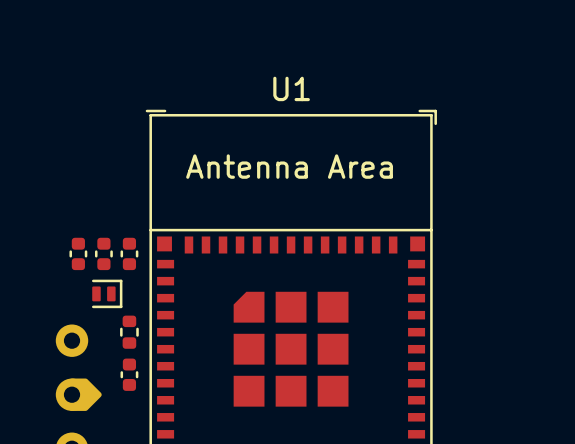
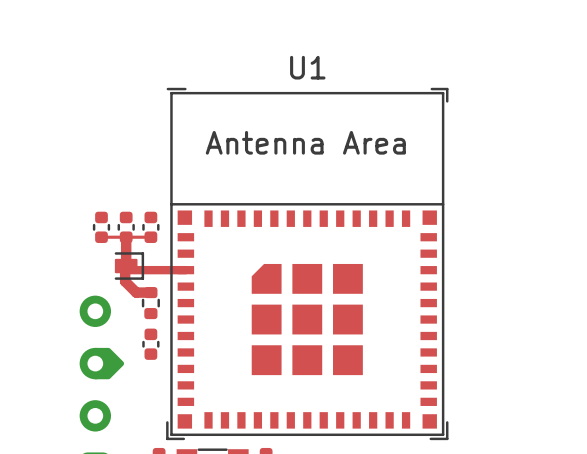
track: none -> (101, 237) (150, 237)
track: none -> (126, 237) (125, 270)
track: none -> (125, 270) (125, 281) (136, 292) (150, 292)
track: none -> (125, 270) (185, 270)

